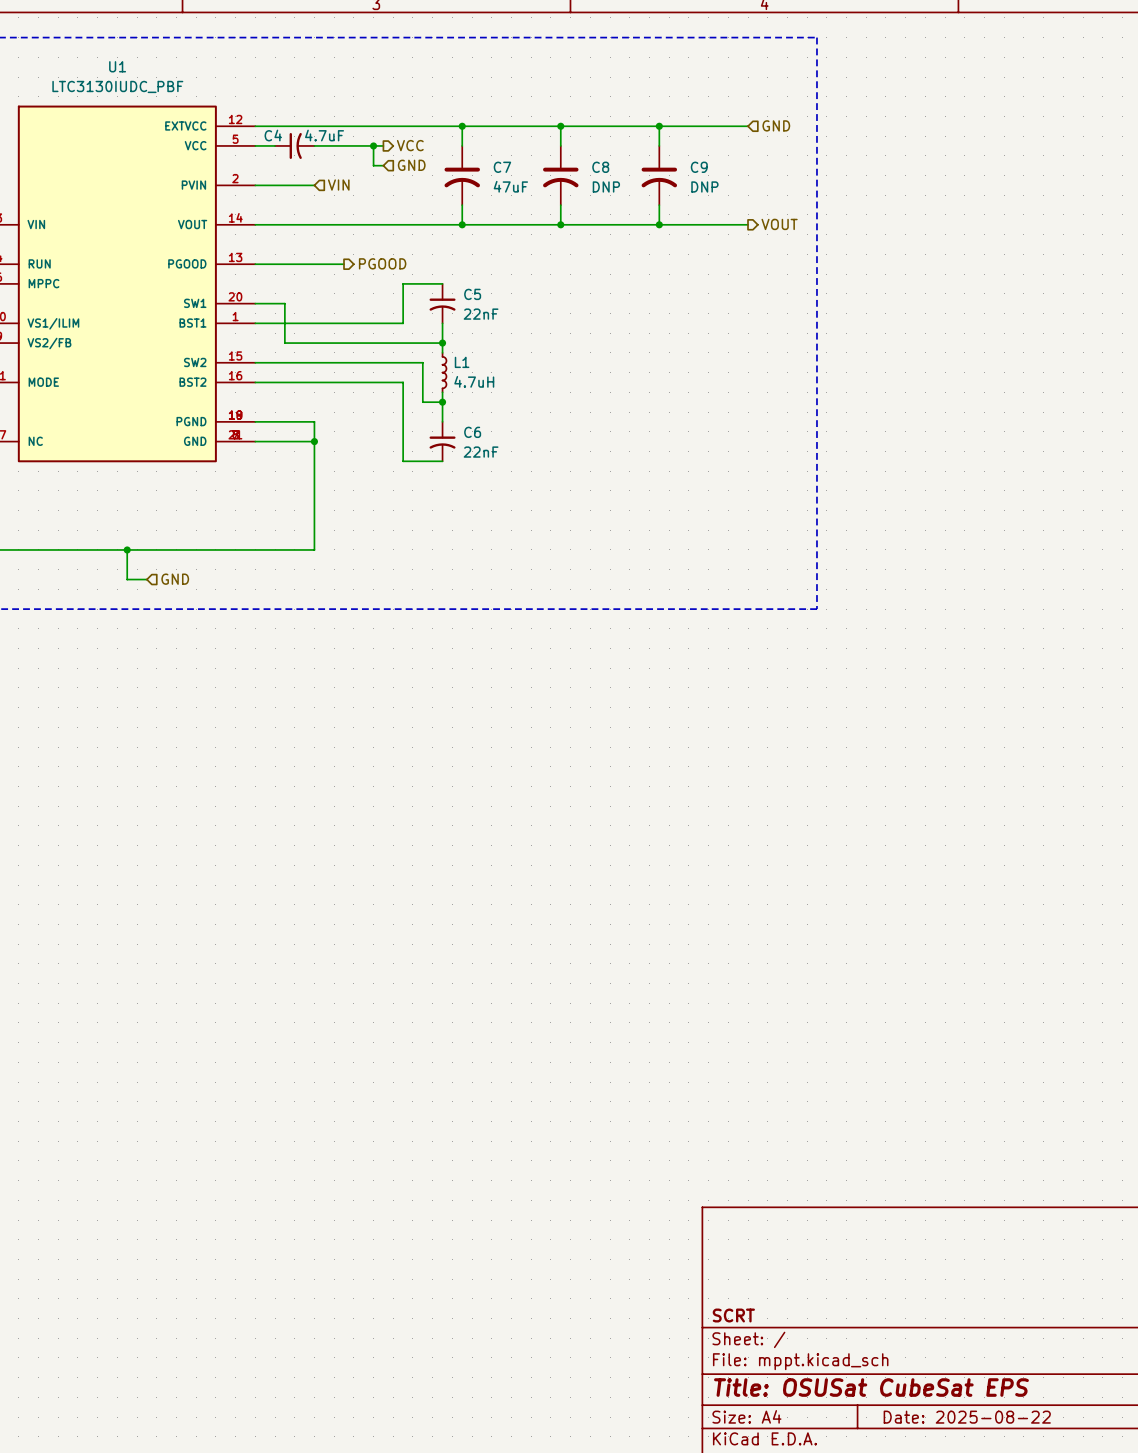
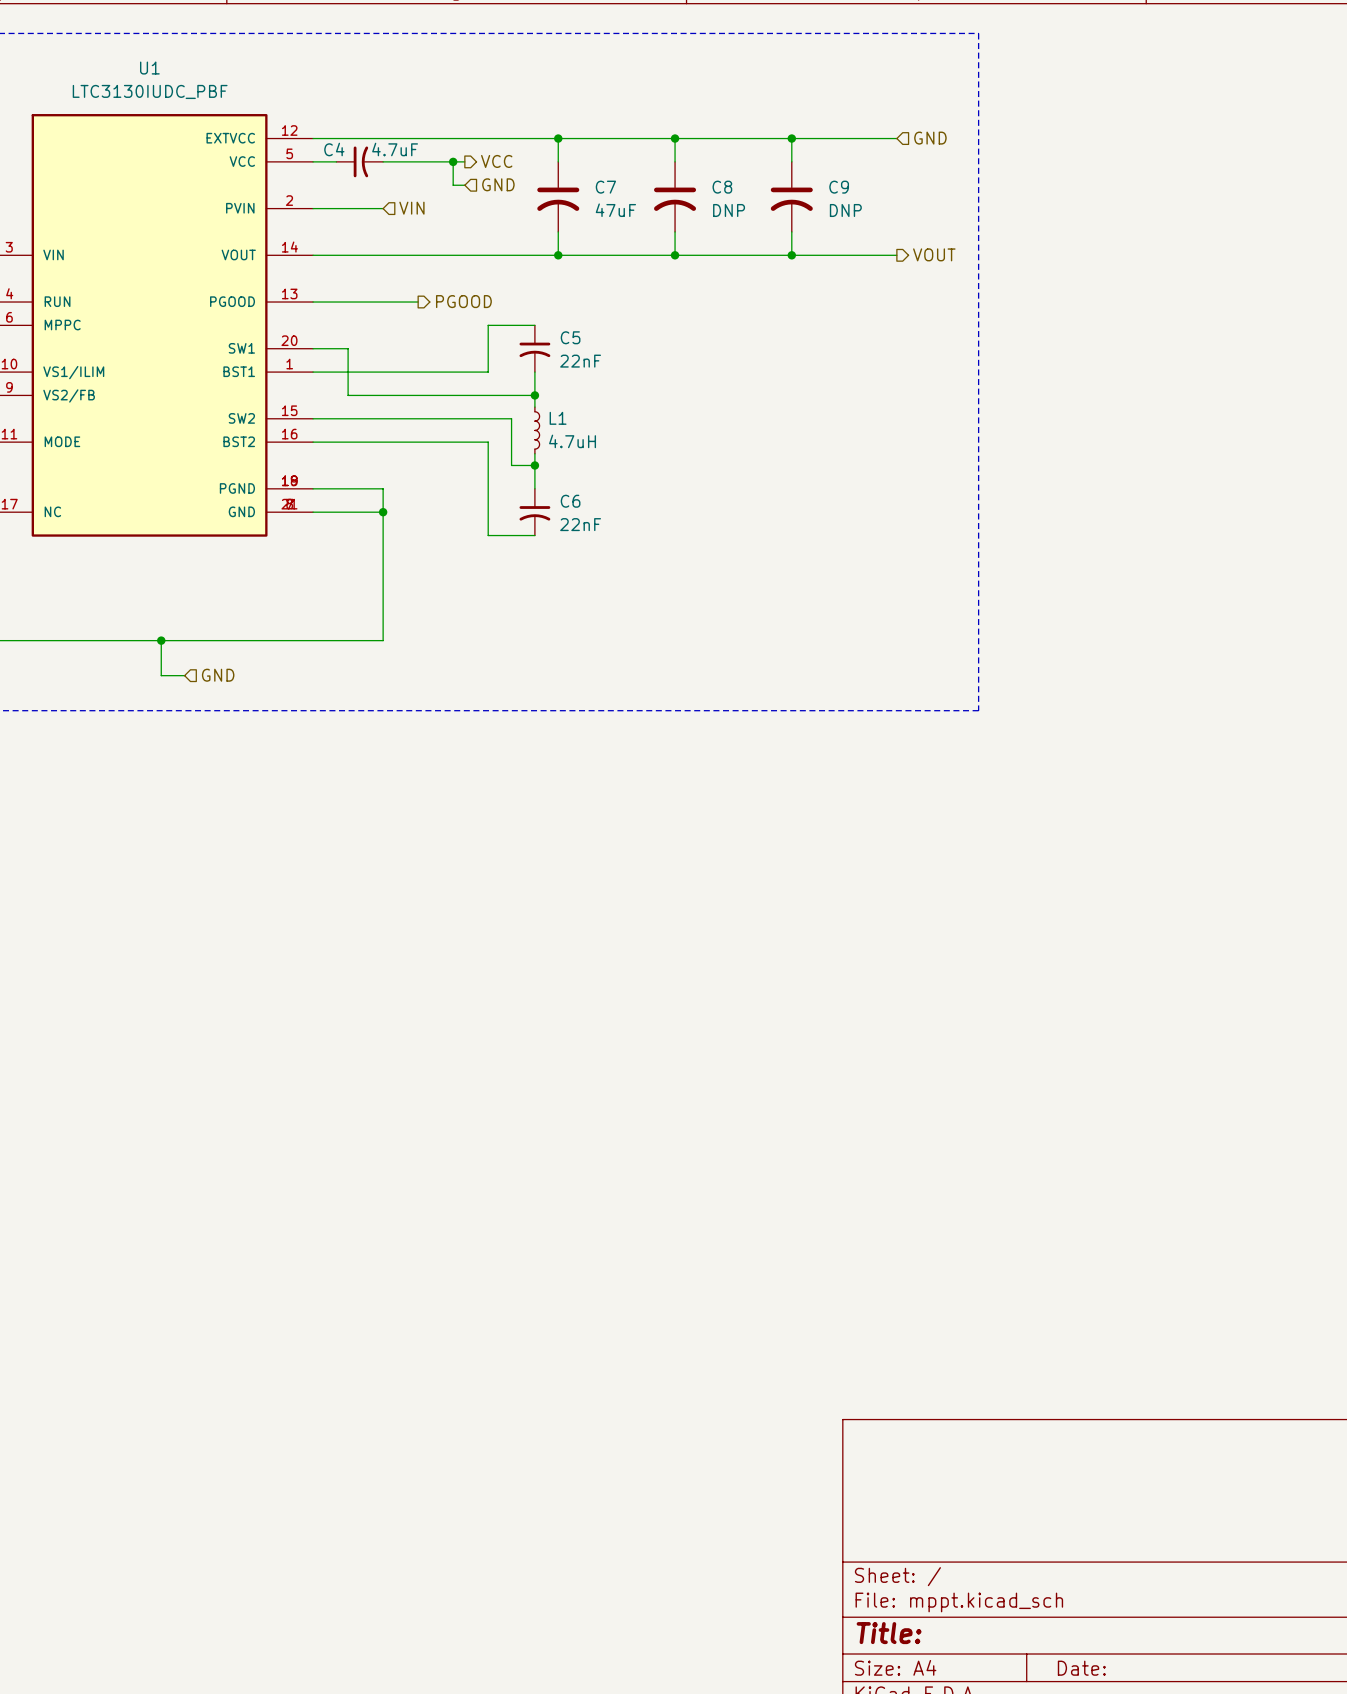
title block: SCRT (733, 1315) -> none
title block: Title: OSUSat CubeSat EPS (871, 1387) -> Title: (889, 1633)
title block: Date: 2025-08-22 (967, 1417) -> Date: (1081, 1668)

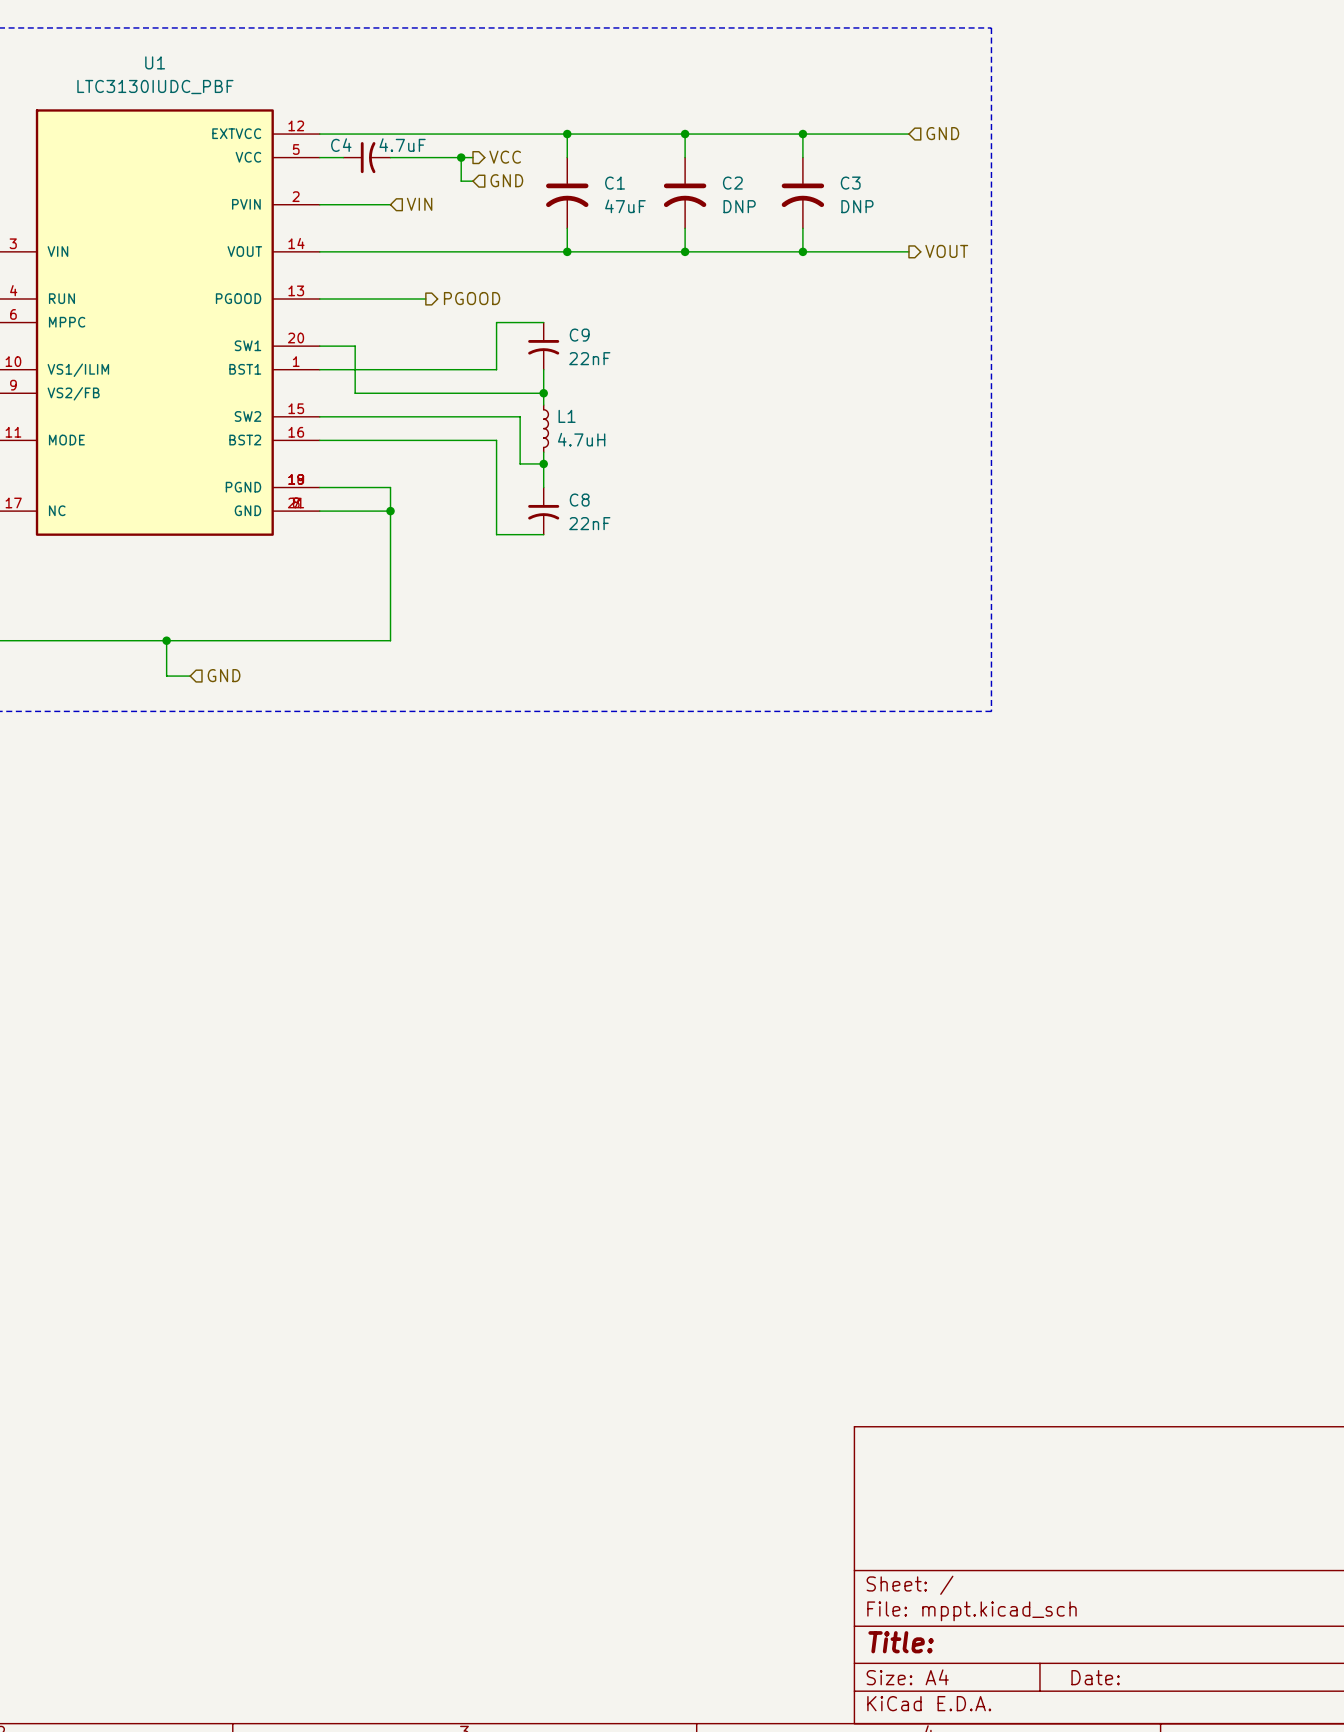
C7 name: C7 (605, 187) -> C1 (615, 183)
C8 name: C8 (722, 187) -> C2 (732, 183)
C9 name: C9 (839, 187) -> C3 (850, 183)
C5 name: C5 (570, 337) -> C9 (579, 335)
C6 name: C6 (570, 501) -> C8 (579, 500)

